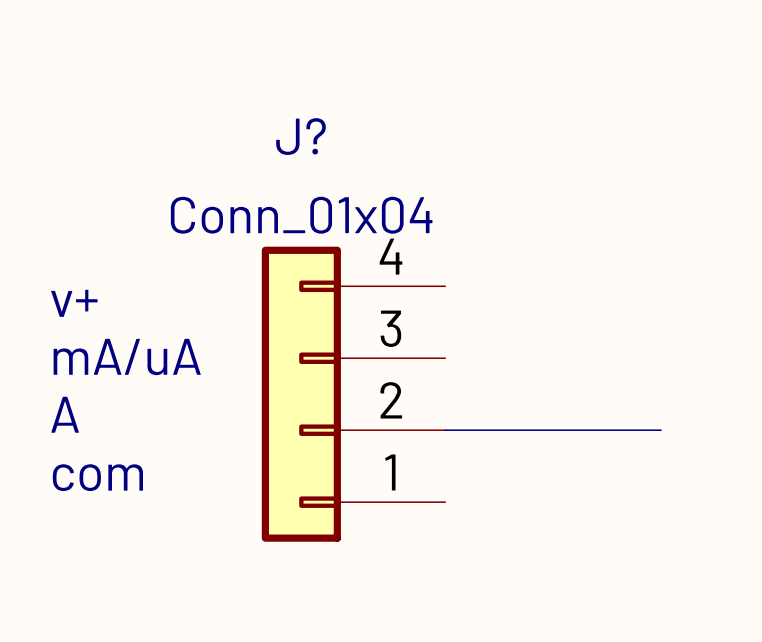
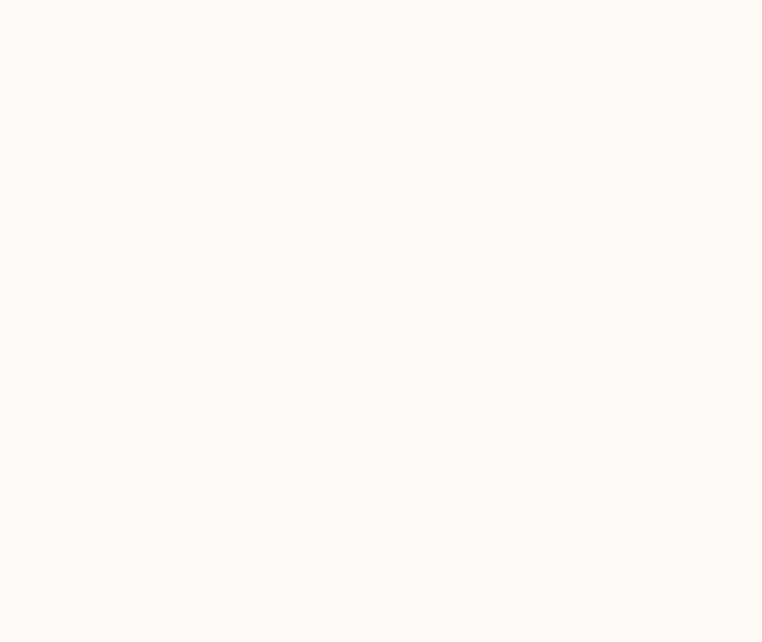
text: v+ (74, 303) -> none
text: mA/uA (127, 357) -> none
J?: Conn_01x04 (353, 394) -> none
text: A (65, 414) -> none
wire: (445, 430) (661, 430) -> none
text: com (97, 477) -> none

